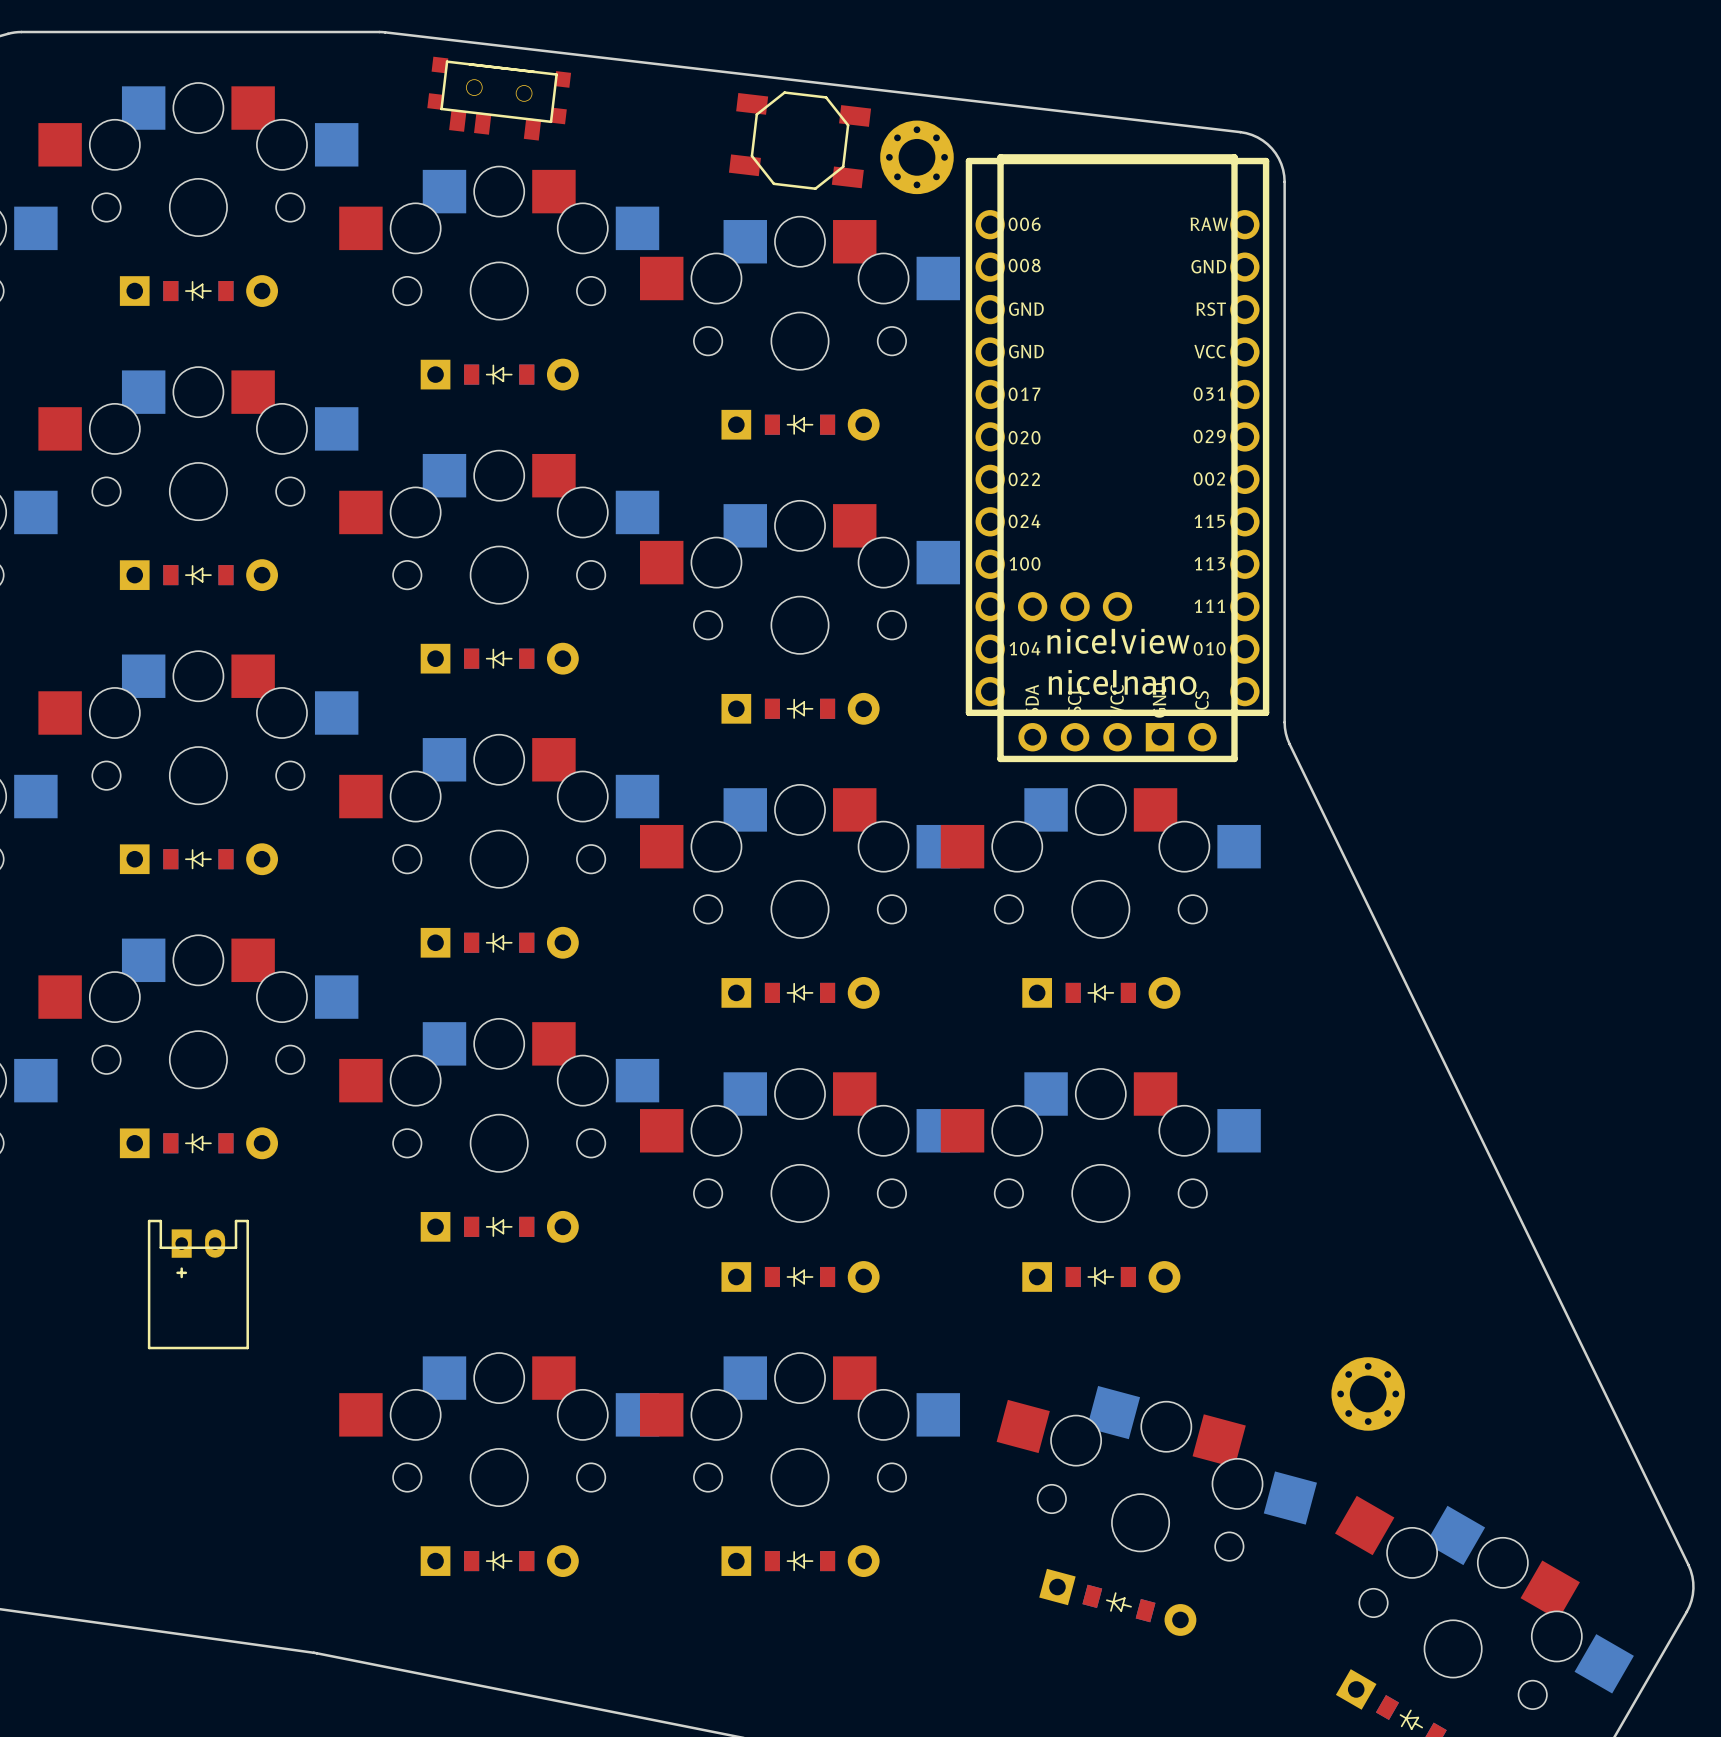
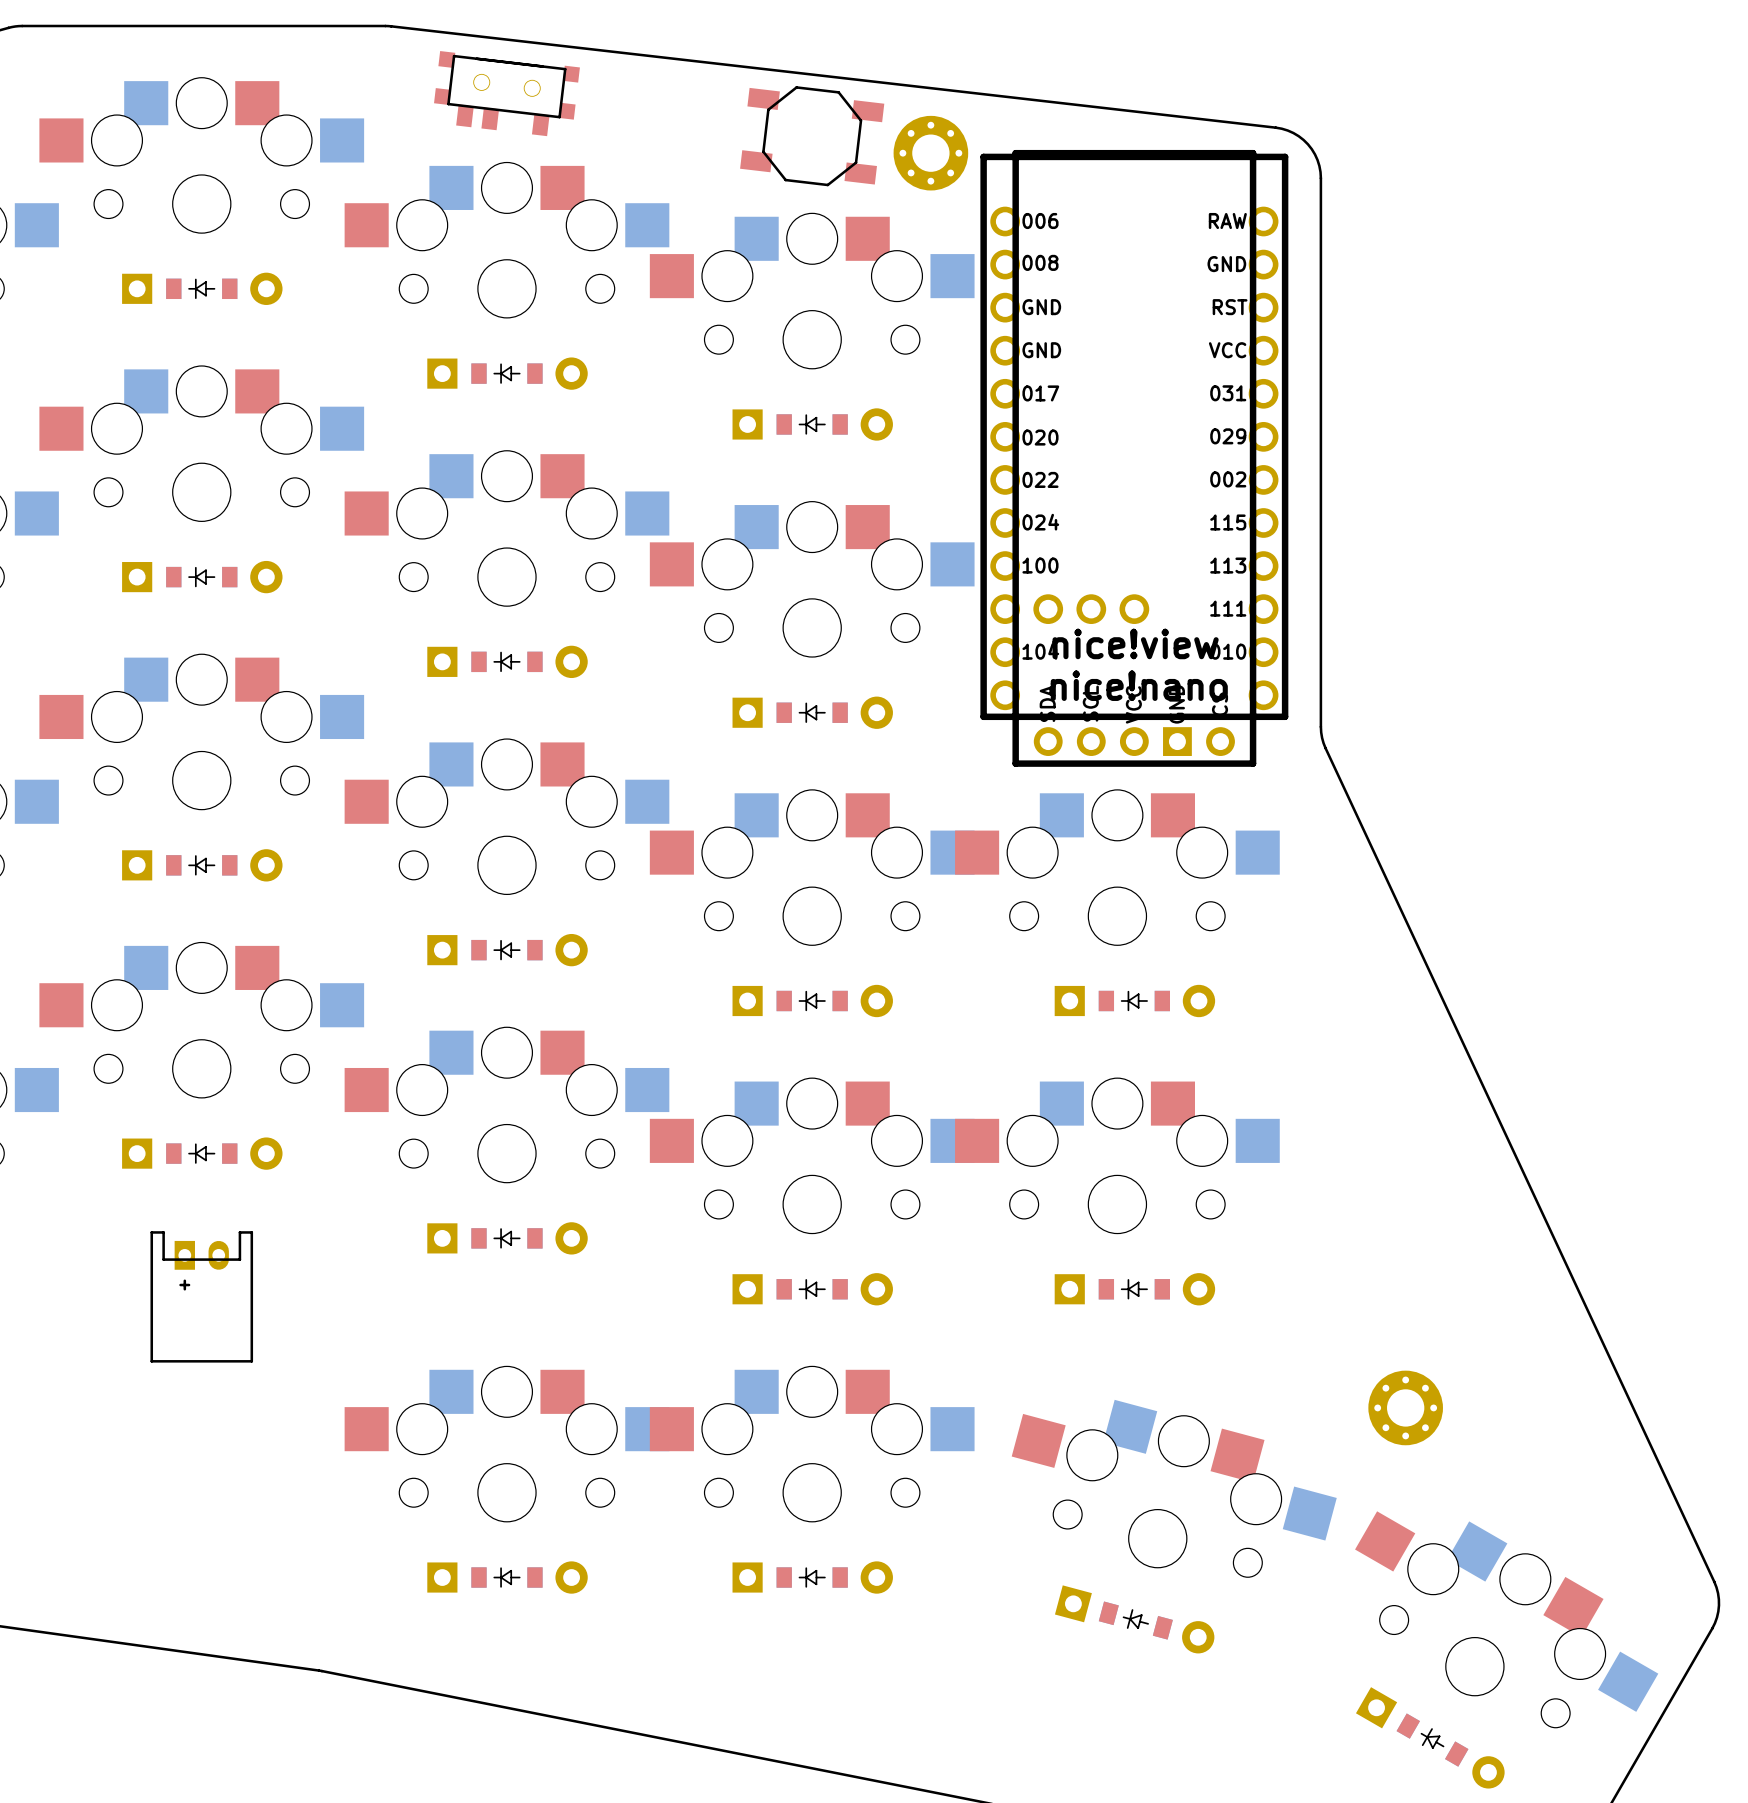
board edge: (379, 32) (1240, 132) (1257, 137) (1271, 148) (1281, 164) (1284, 181) (1285, 733) (1688, 1564) (1693, 1588) (1686, 1611) -> (385, 26) (1275, 127) (1293, 133) (1307, 144) (1317, 160) (1320, 178) (1322, 737) (1714, 1581) (1718, 1605) (1717, 1617) (1711, 1629)
part position: (1101, 992) -> (1134, 1001)
part position: (1101, 1276) -> (1134, 1289)
part position: (1368, 1393) -> (1405, 1407)

